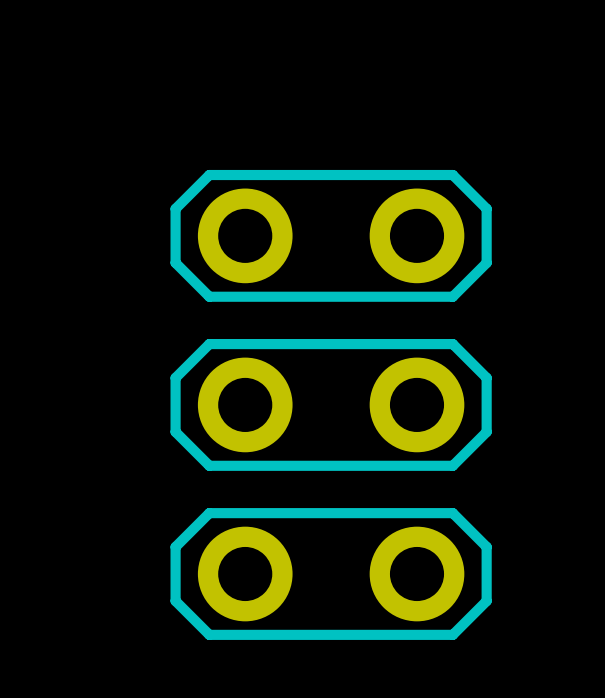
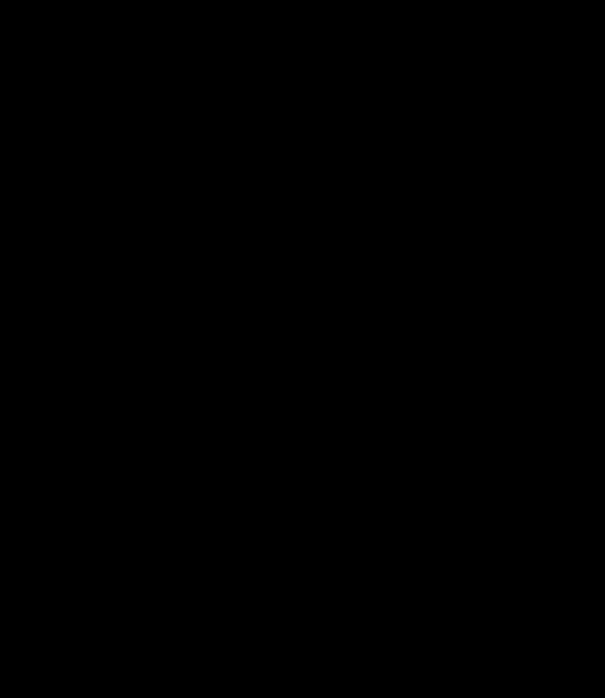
part: (331, 235) -> none
part: (331, 404) -> none
part: (331, 574) -> none

